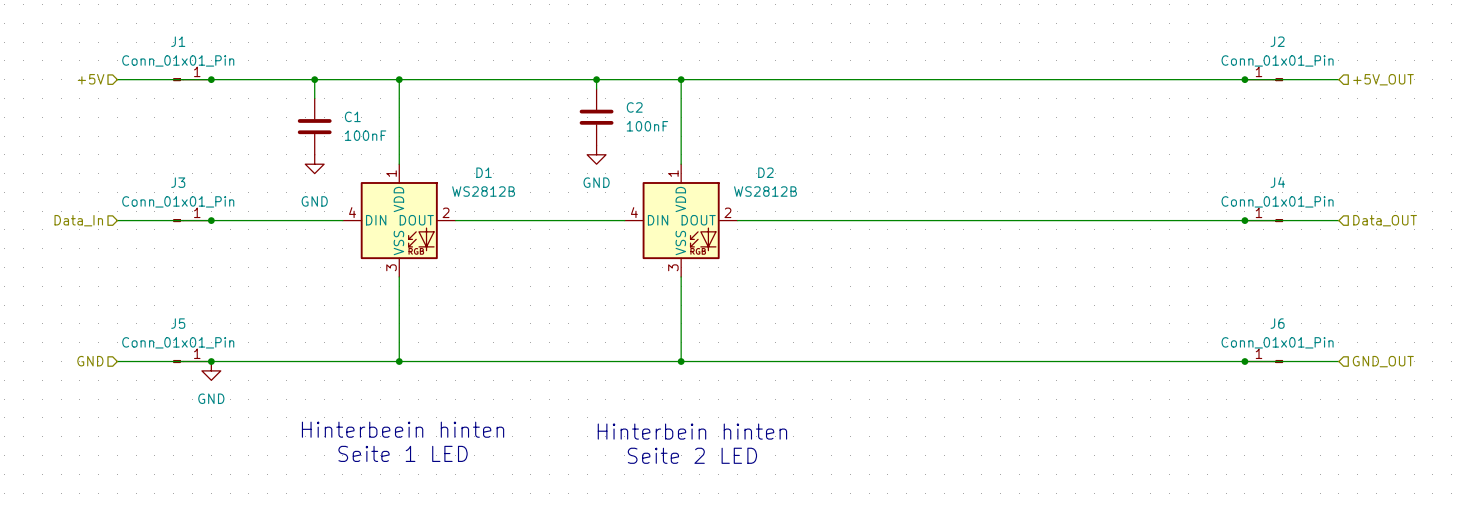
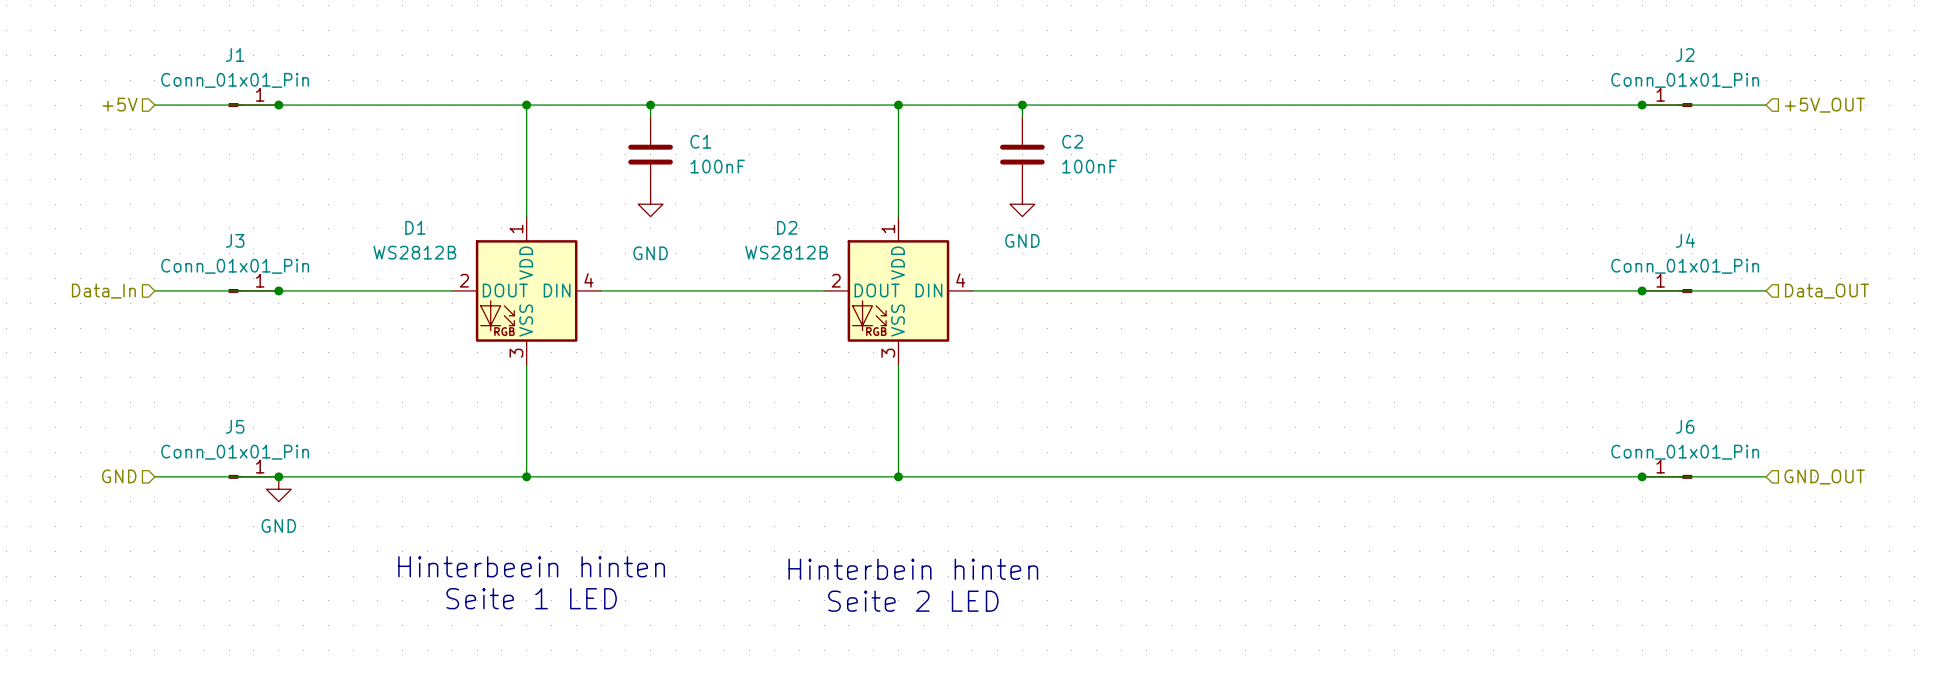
wire: (314, 79) (314, 98) -> none
junction: (314, 79) -> none
junction: none -> (650, 105)
wire: (596, 79) (596, 89) -> (650, 105) (650, 117)
junction: (596, 79) -> none
wire: none -> (1022, 105) (1022, 117)
junction: none -> (1022, 105)
C2 position: (596, 117) -> (1022, 154)
C1 position: (314, 126) -> (650, 154)
power symbol: none -> GND (650, 204)
power symbol: GND (596, 154) -> none
power symbol: none -> GND (1022, 204)
power symbol: GND (314, 164) -> none
D1 flip: as is (399, 220) -> left-right (526, 290)
D2 flip: as is (681, 220) -> left-right (898, 290)

